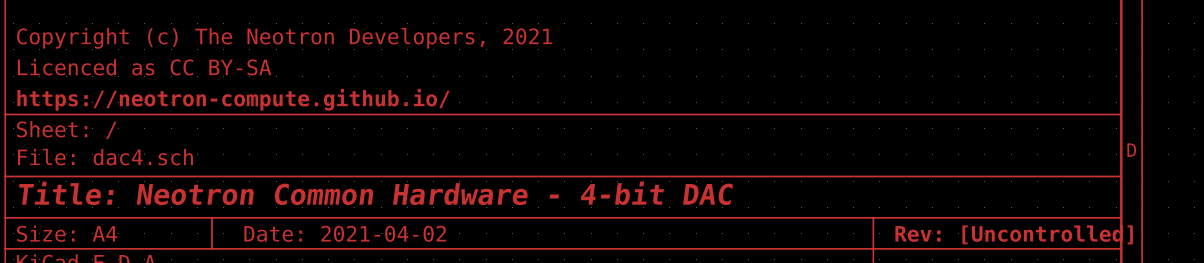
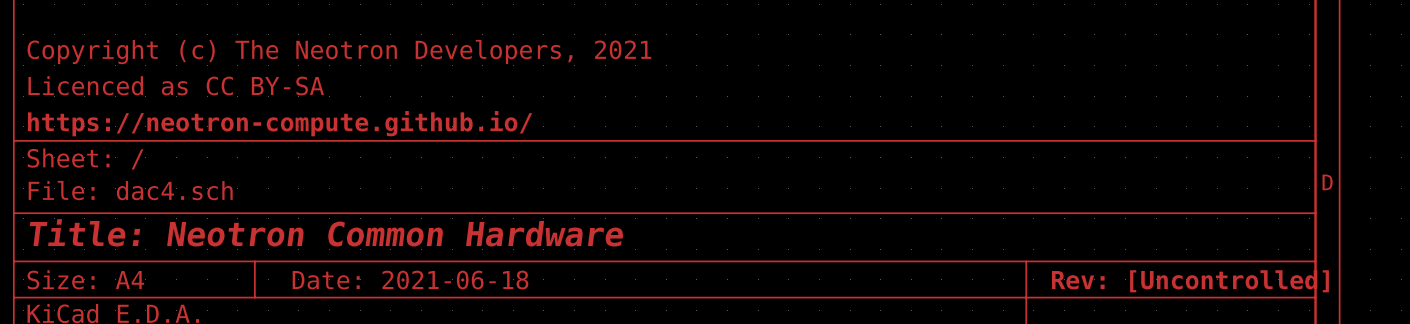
title block: Title: Neotron Common Hardware - 4-bit DAC (375, 193) -> Title: Neotron Common Hardware (326, 232)
title block: Date: 2021-04-02 (345, 233) -> Date: 2021-06-18 (410, 280)

